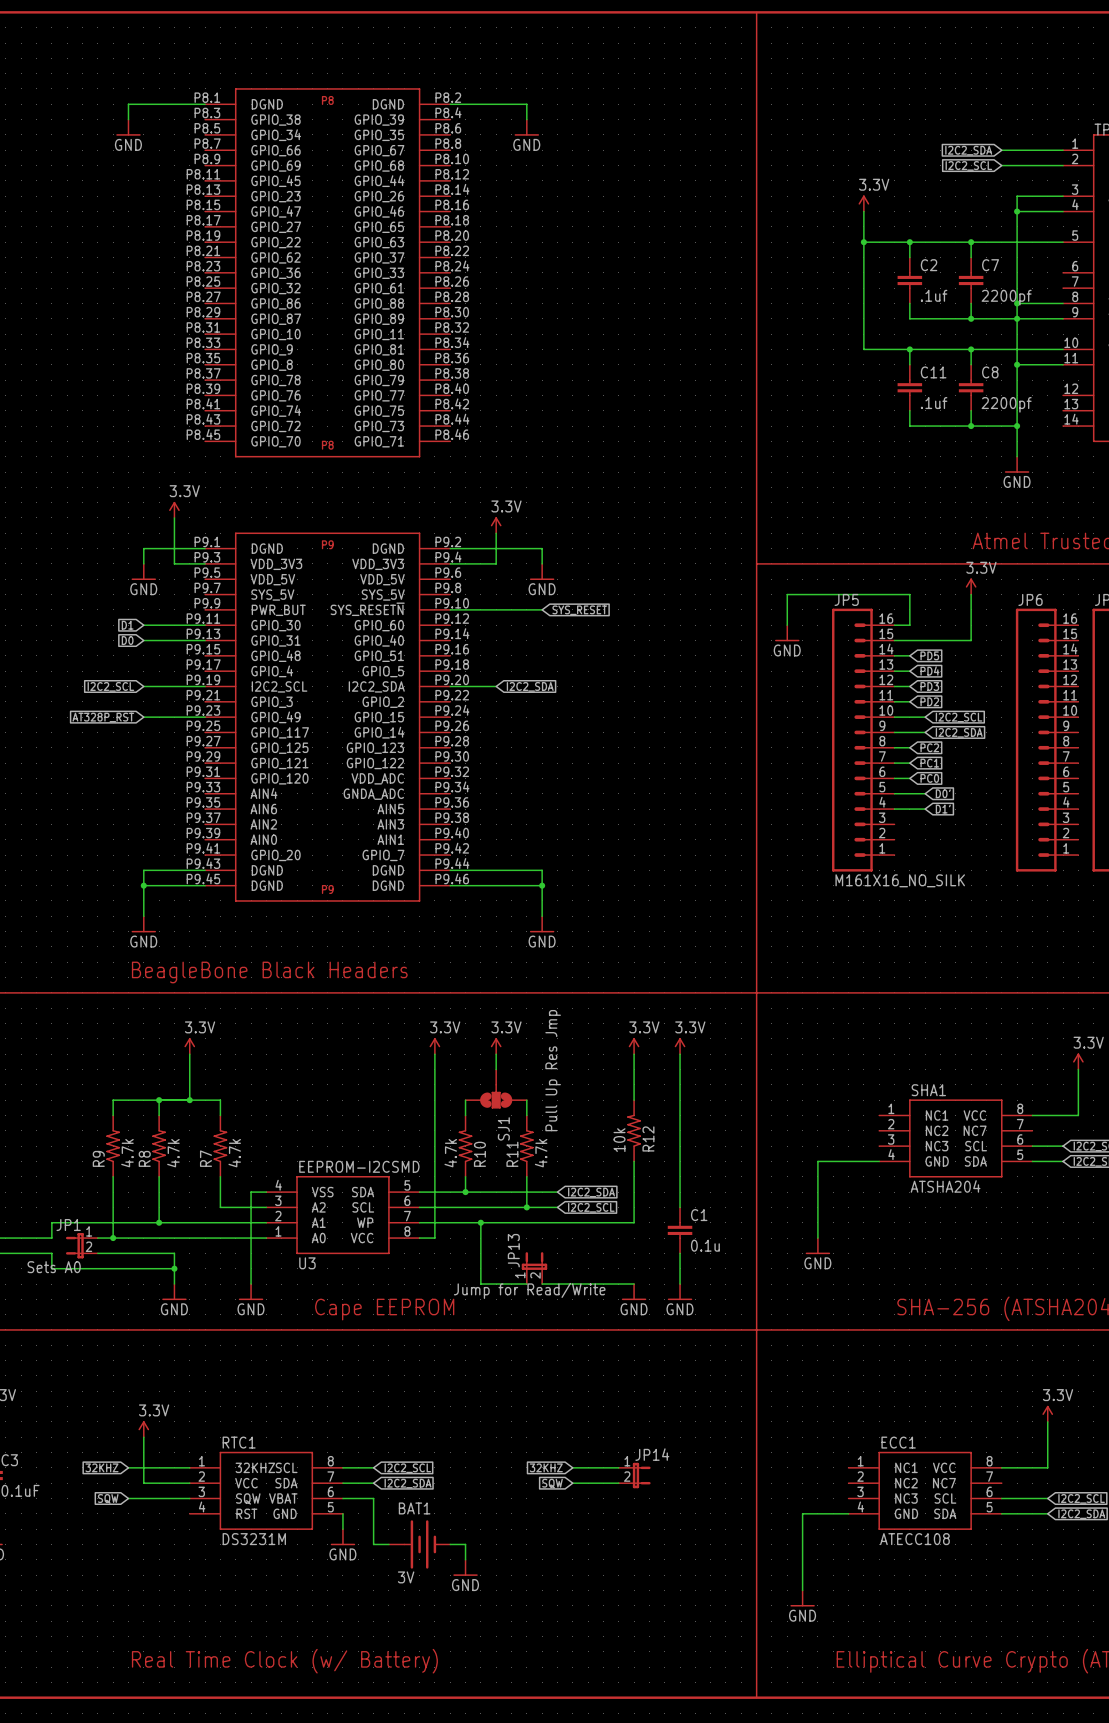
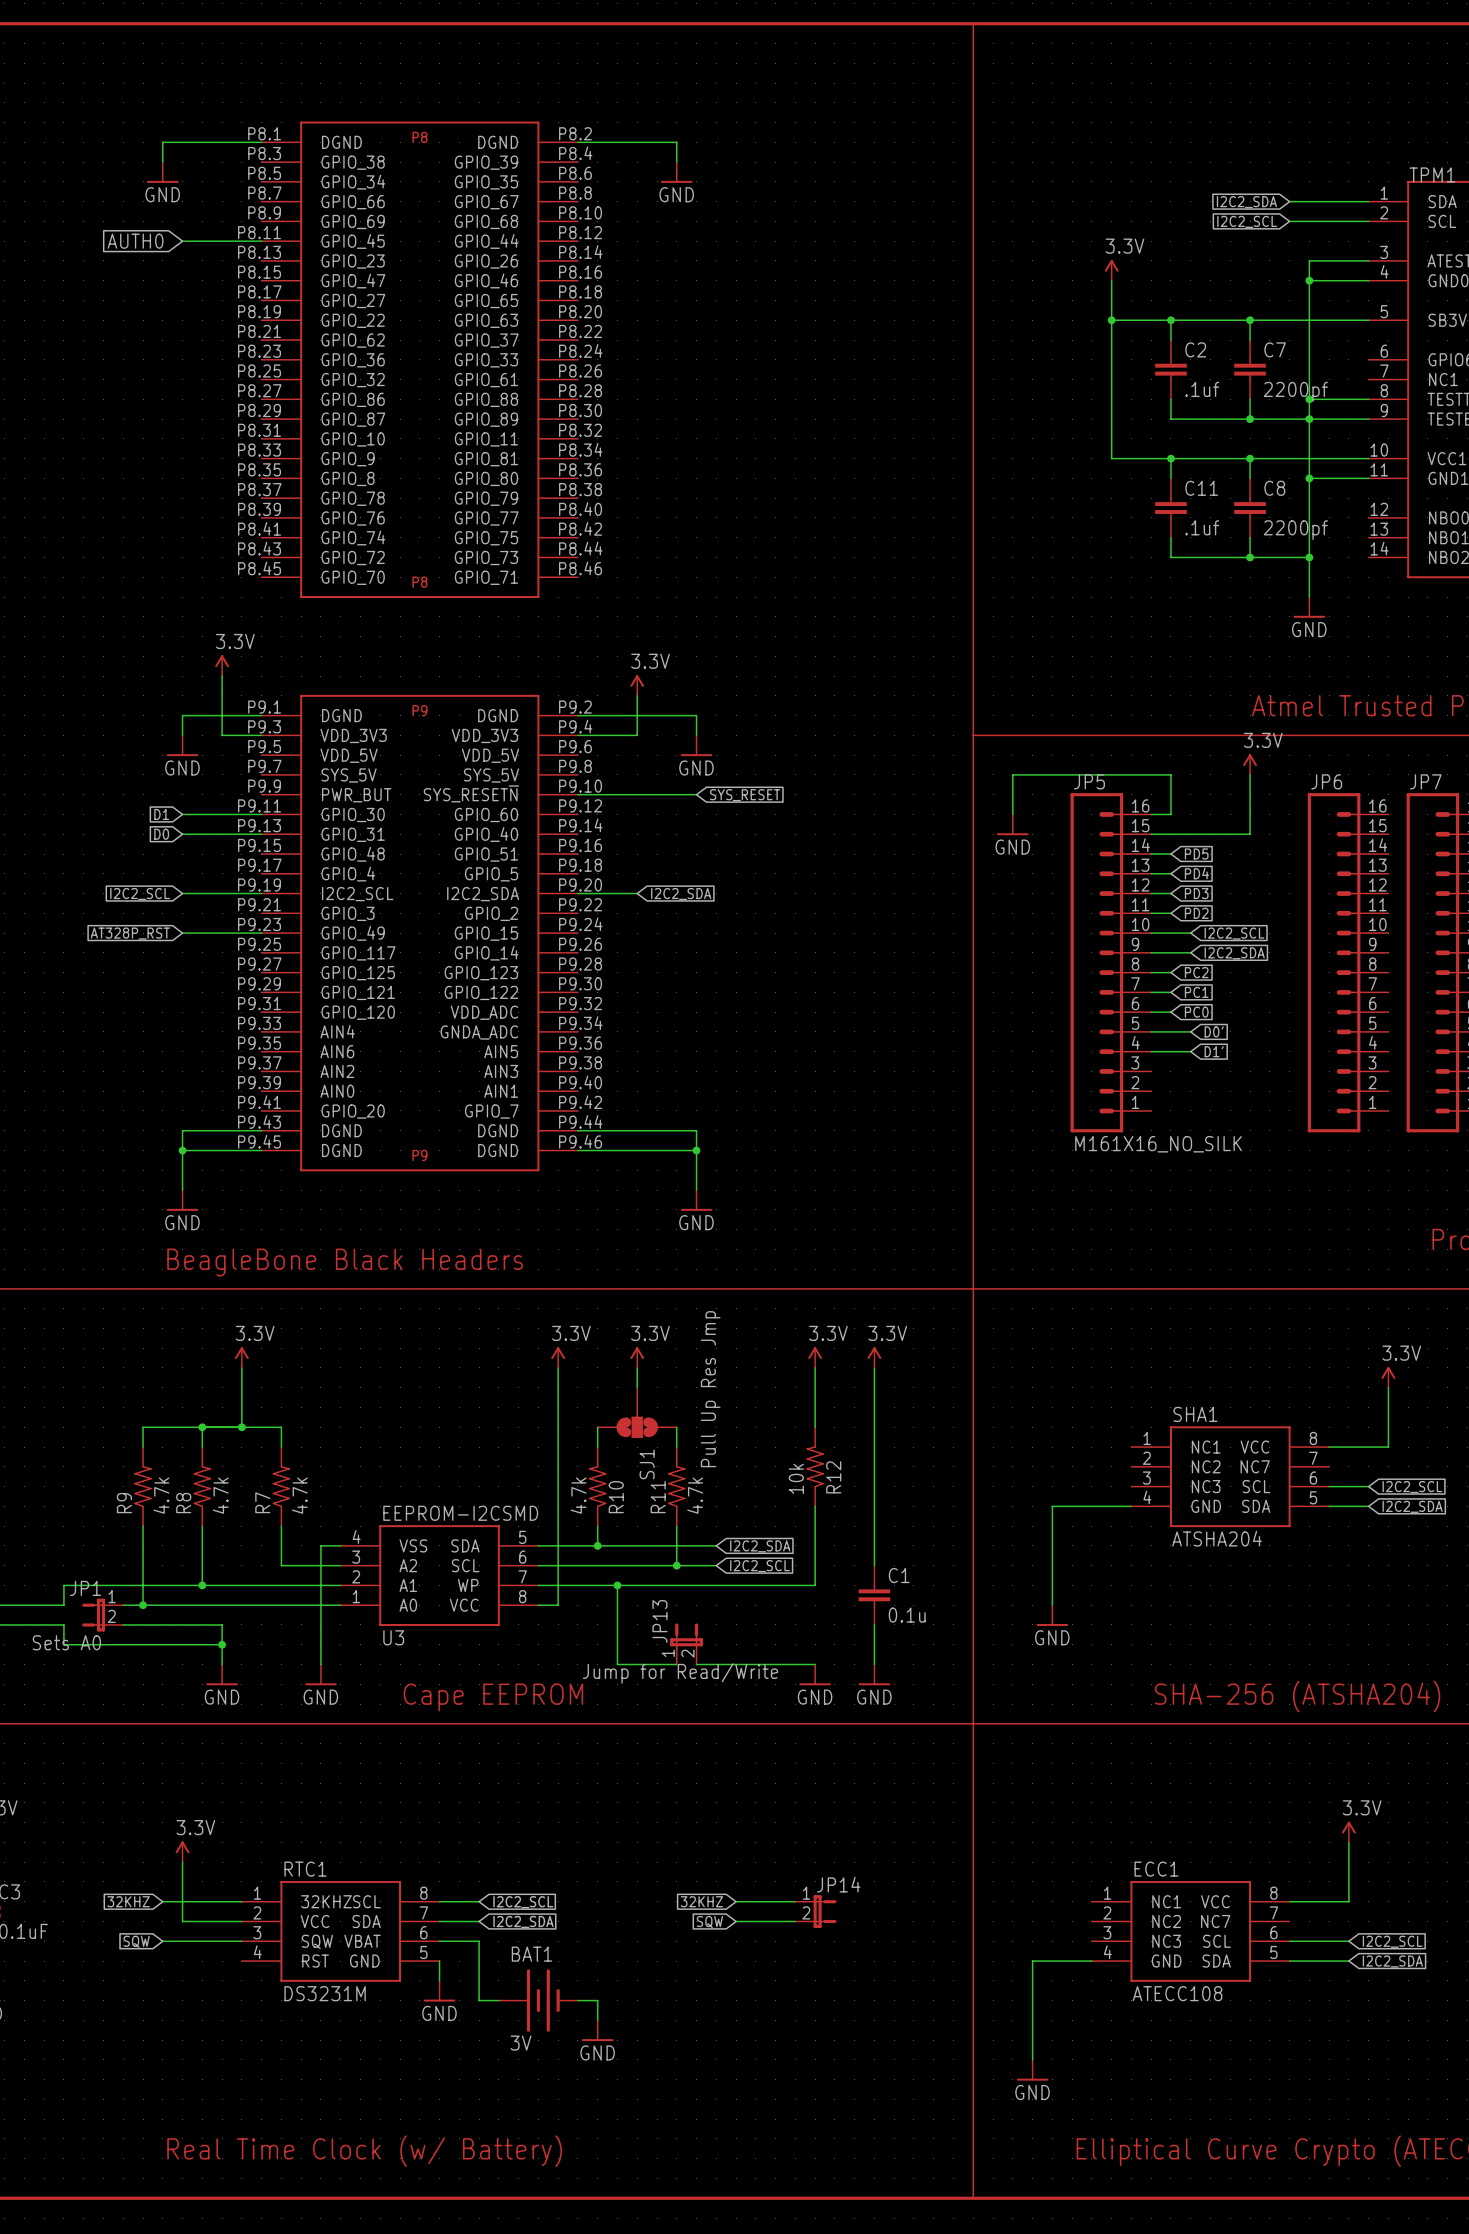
global label: none -> AUTH0 (135, 241)
wire: none -> (182, 241) (261, 241)

